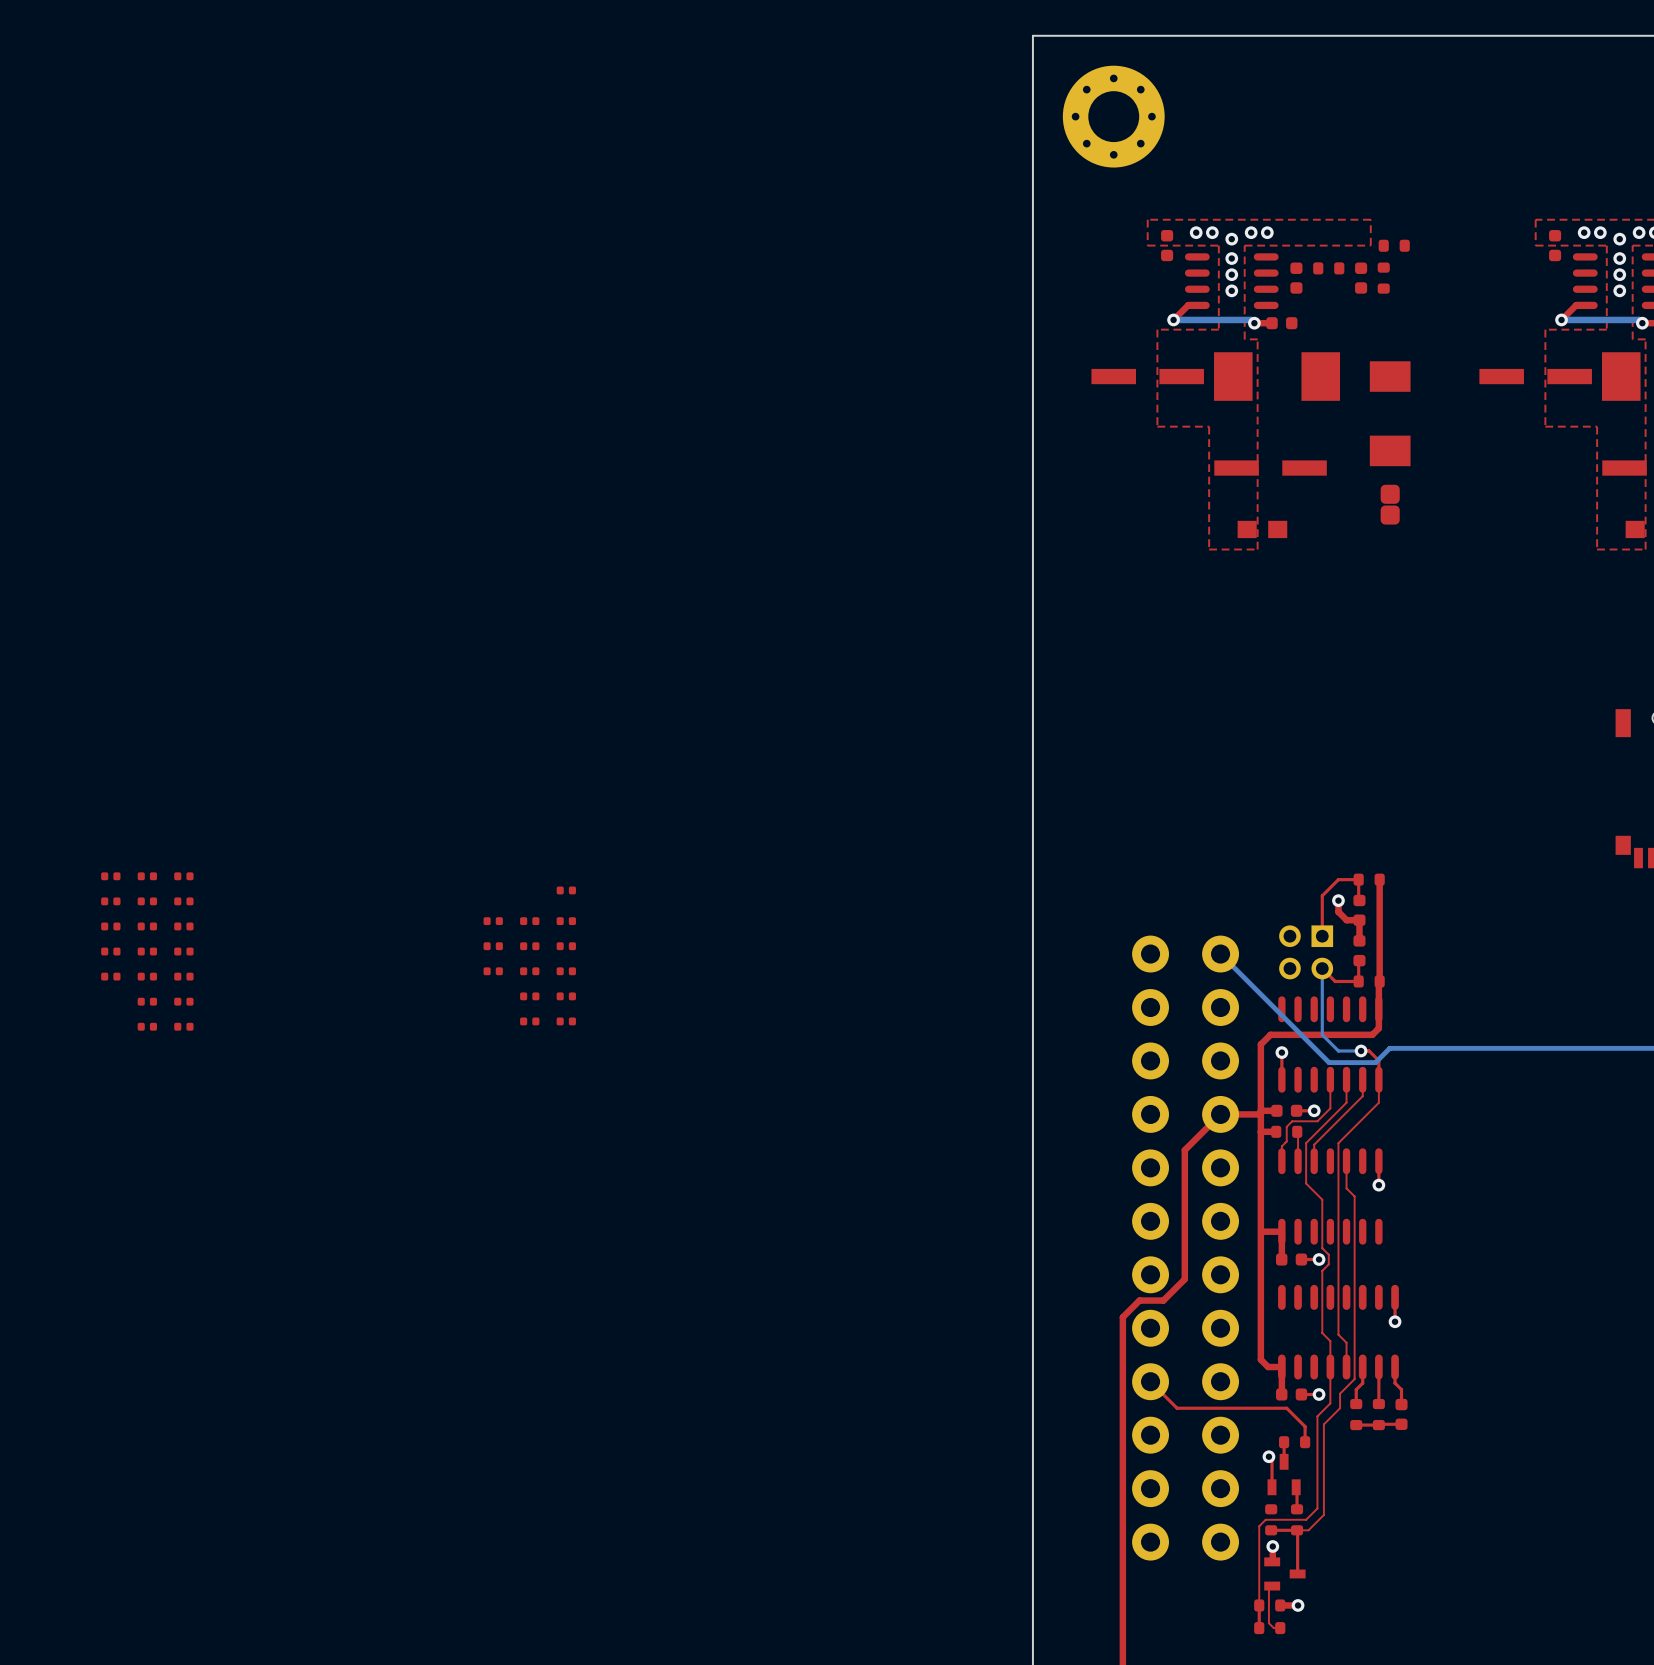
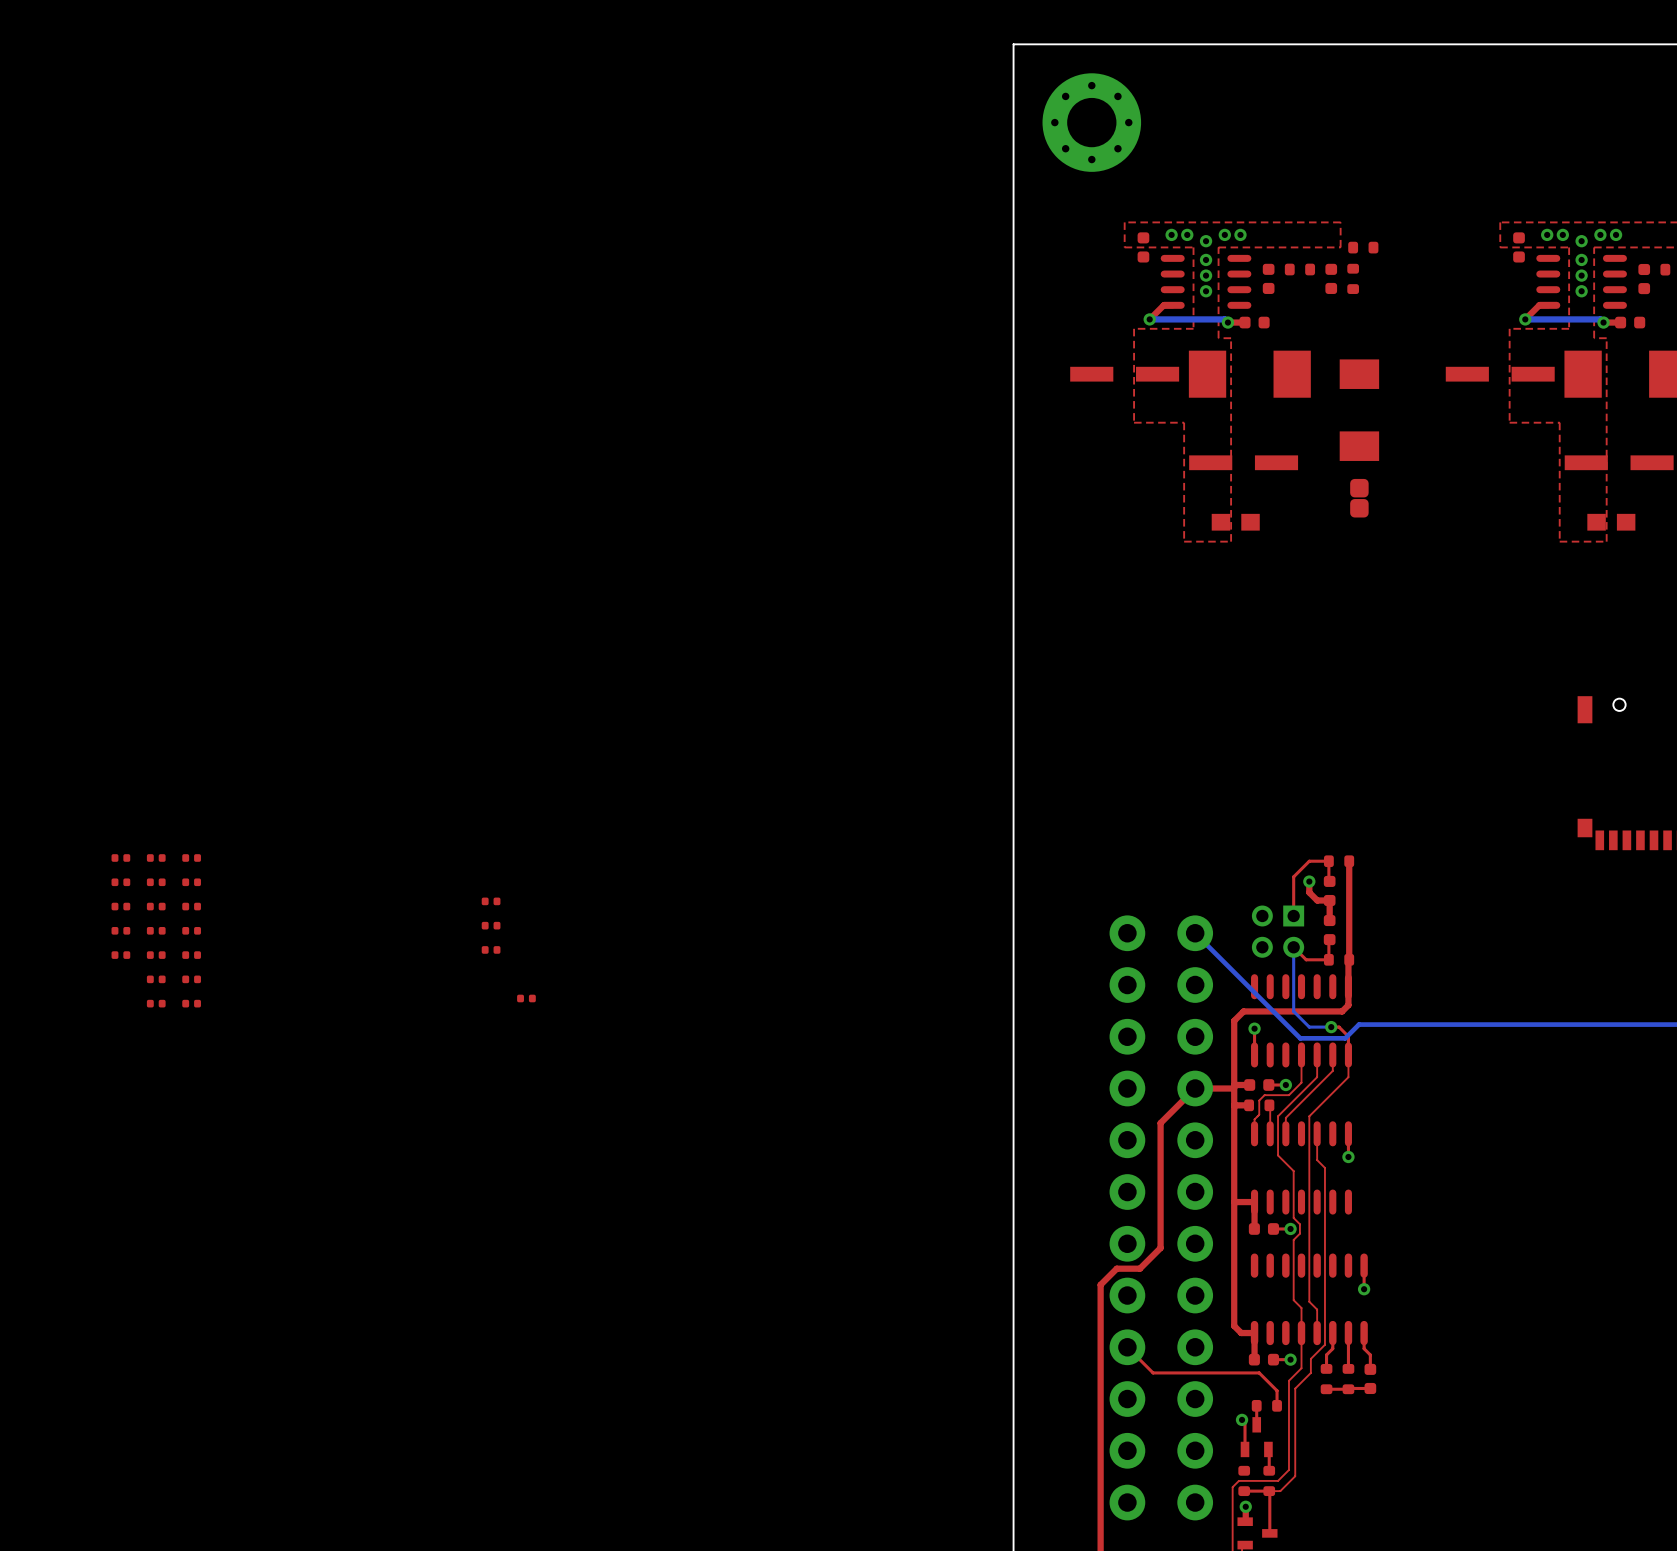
part: (566, 890) -> none
part: (529, 921) -> none
part: (566, 921) -> none
part: (529, 946) -> none
part: (566, 946) -> none
part: (529, 971) -> none
part: (566, 971) -> none
part: (529, 996) -> none
part: (566, 996) -> none
part: (566, 1021) -> none

